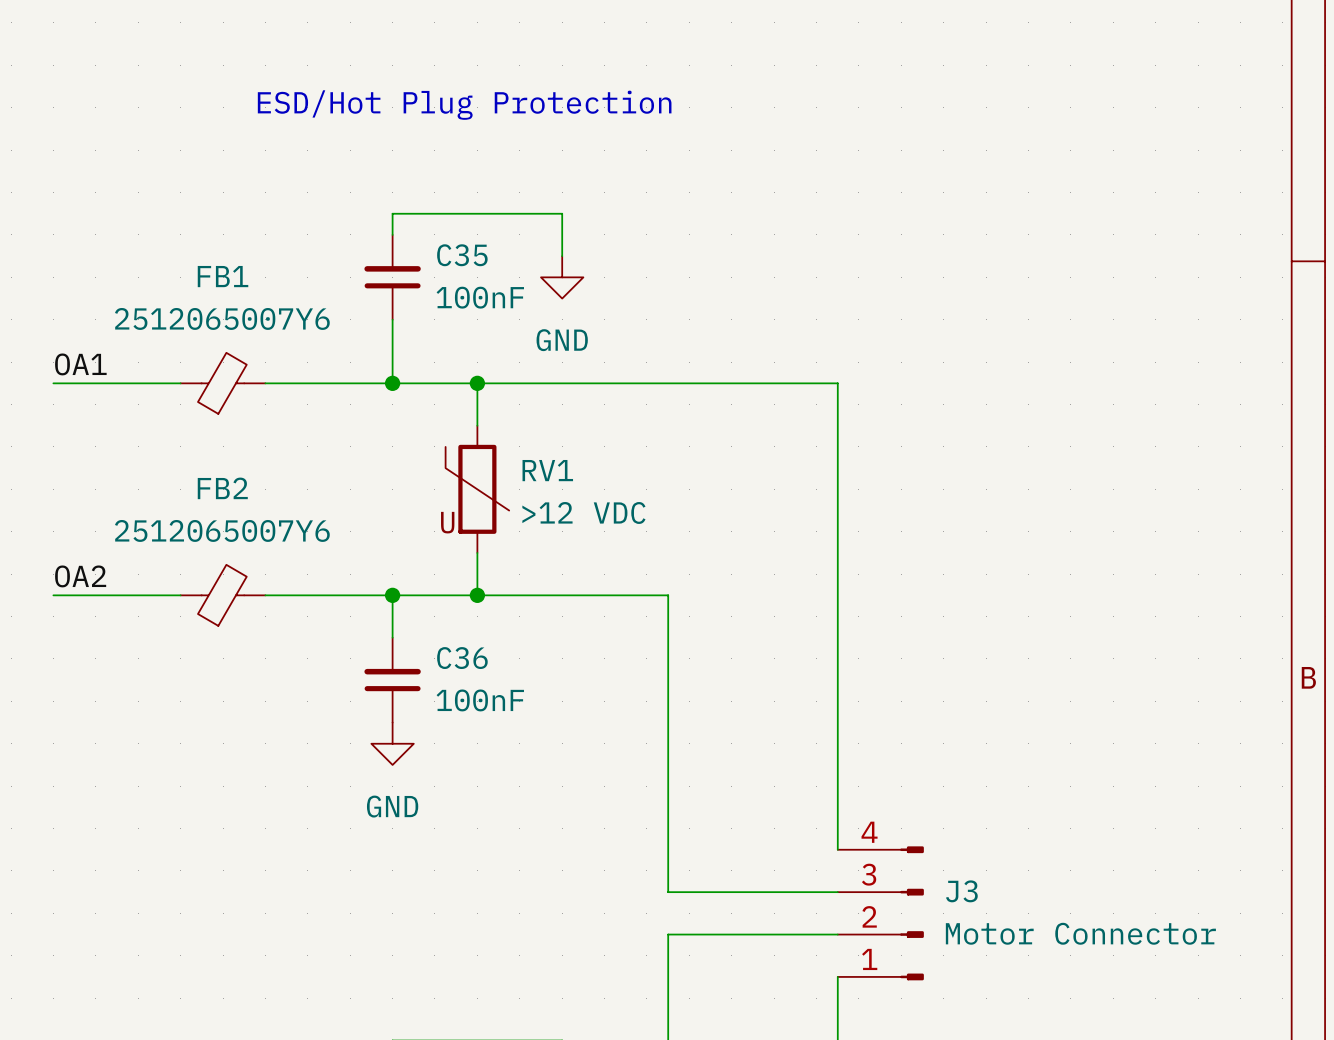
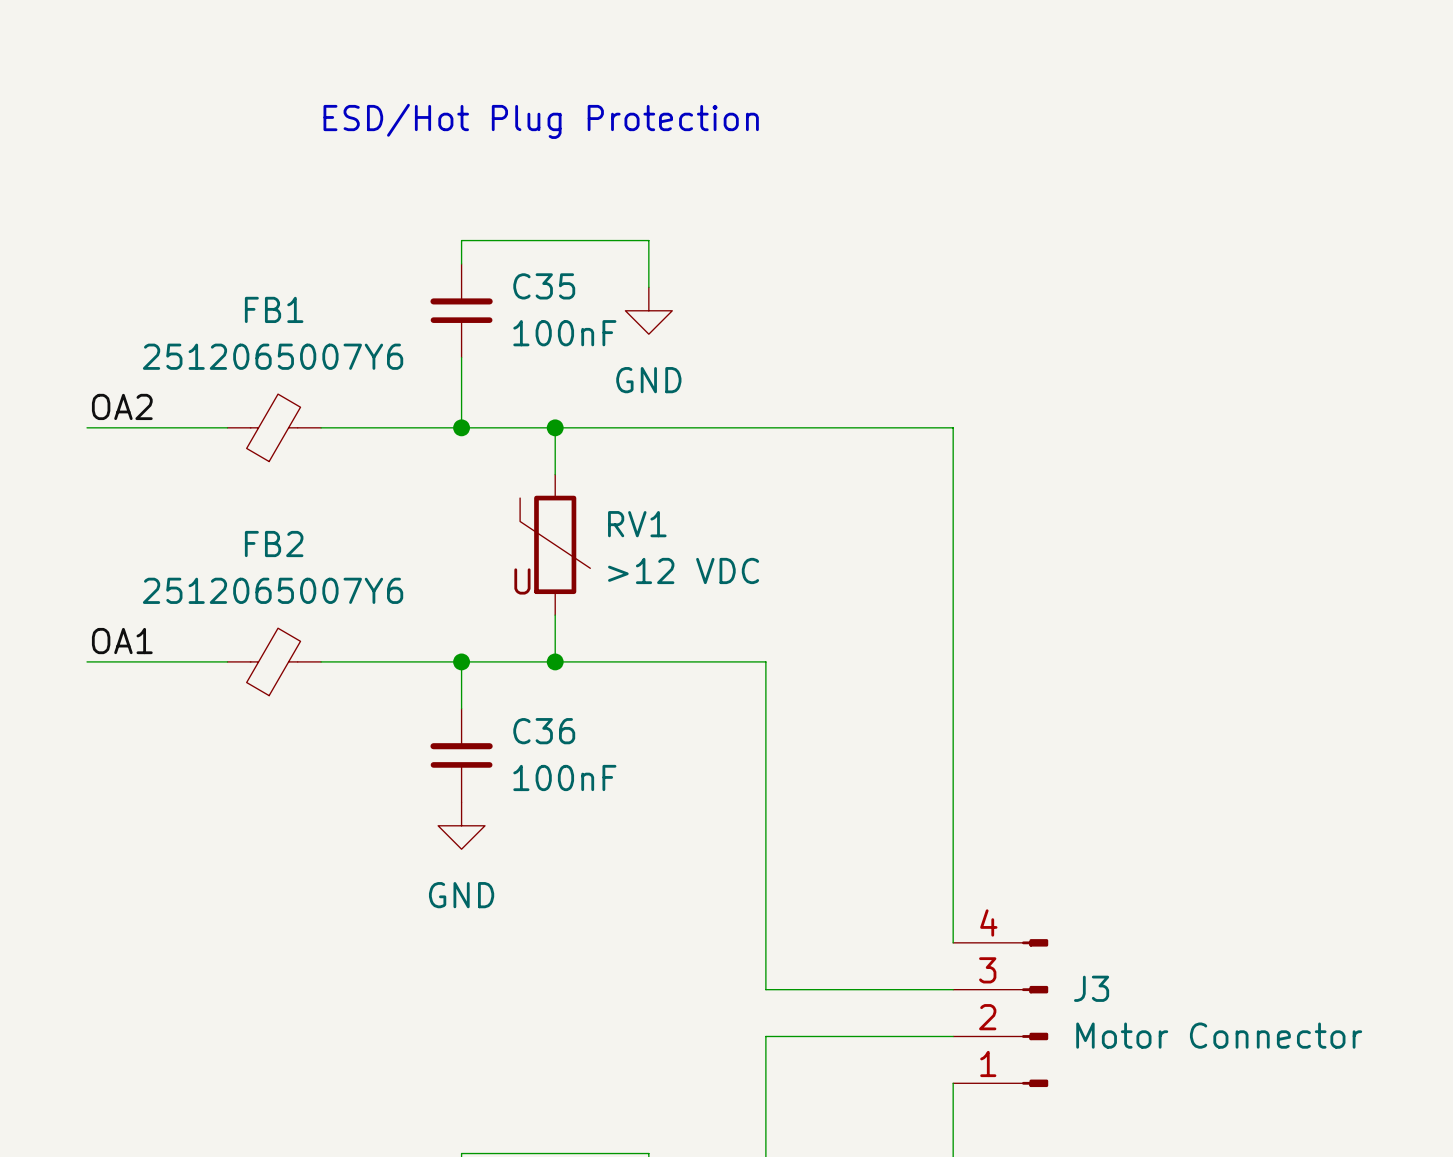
label: OA1 (80, 364) -> OA2 (122, 406)
label: OA2 (80, 576) -> OA1 (122, 641)

